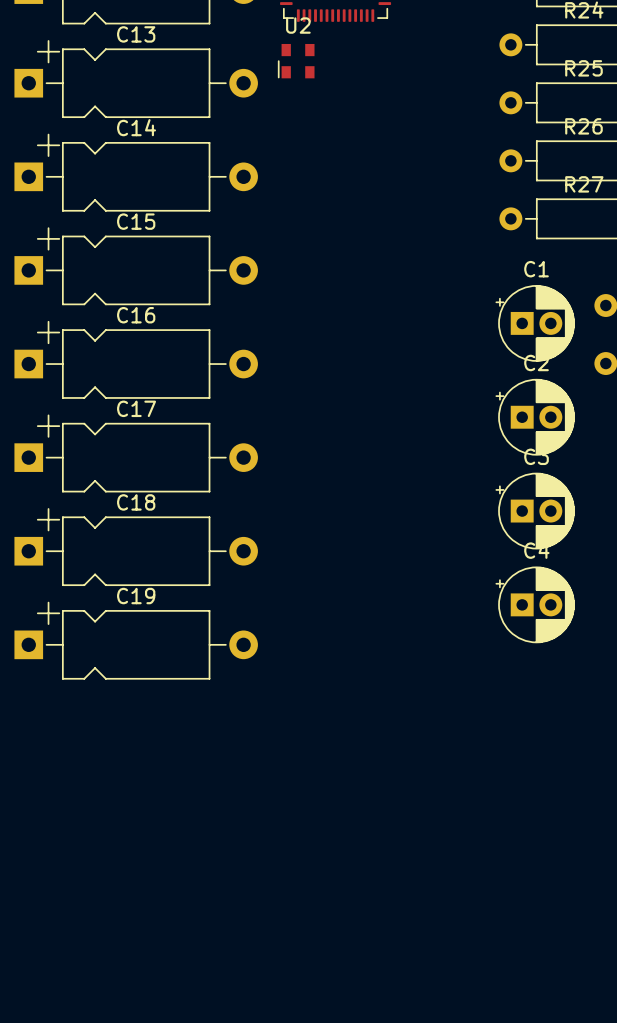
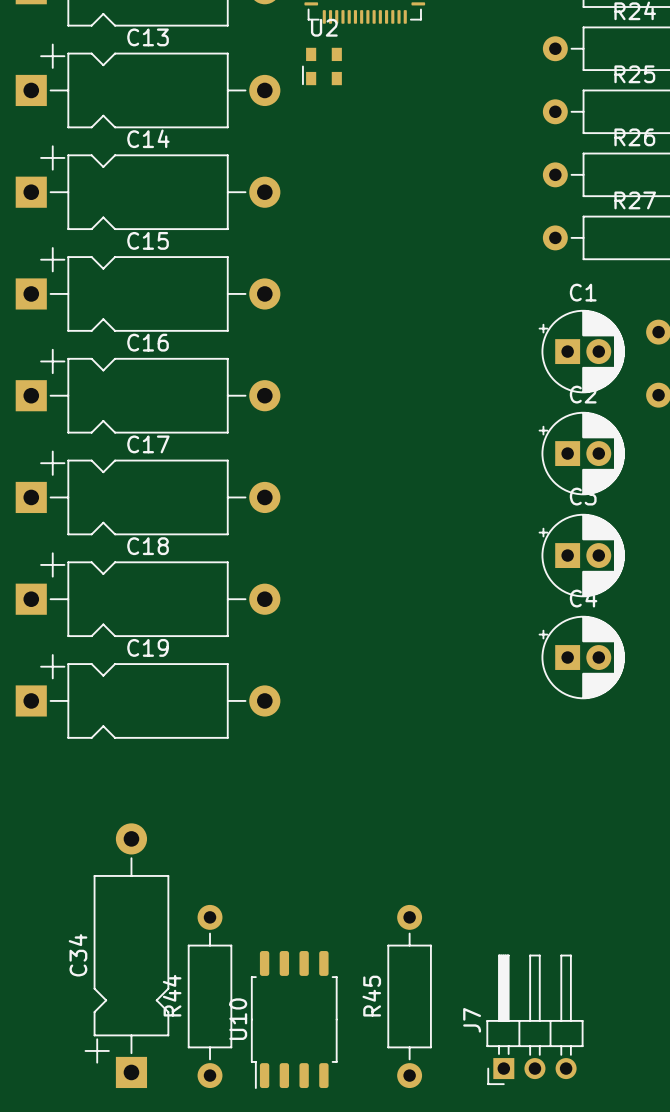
C34: none -> (126, 955)
R44: none -> (210, 996)
R45: none -> (409, 996)
U10: none -> (294, 1019)
J7: none -> (534, 1019)

